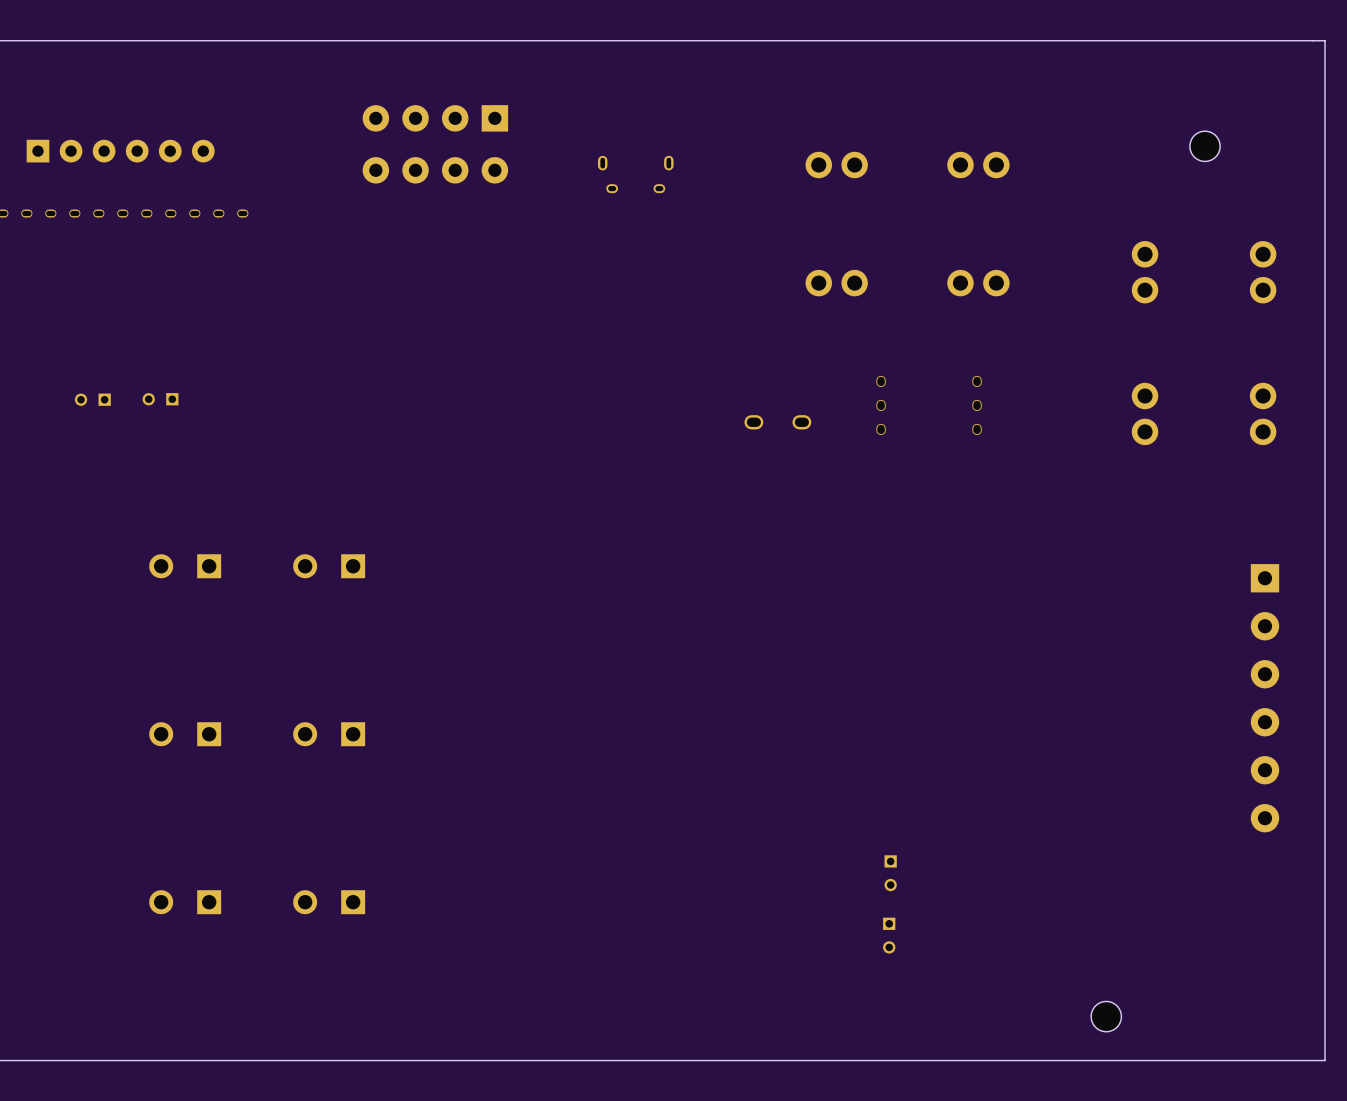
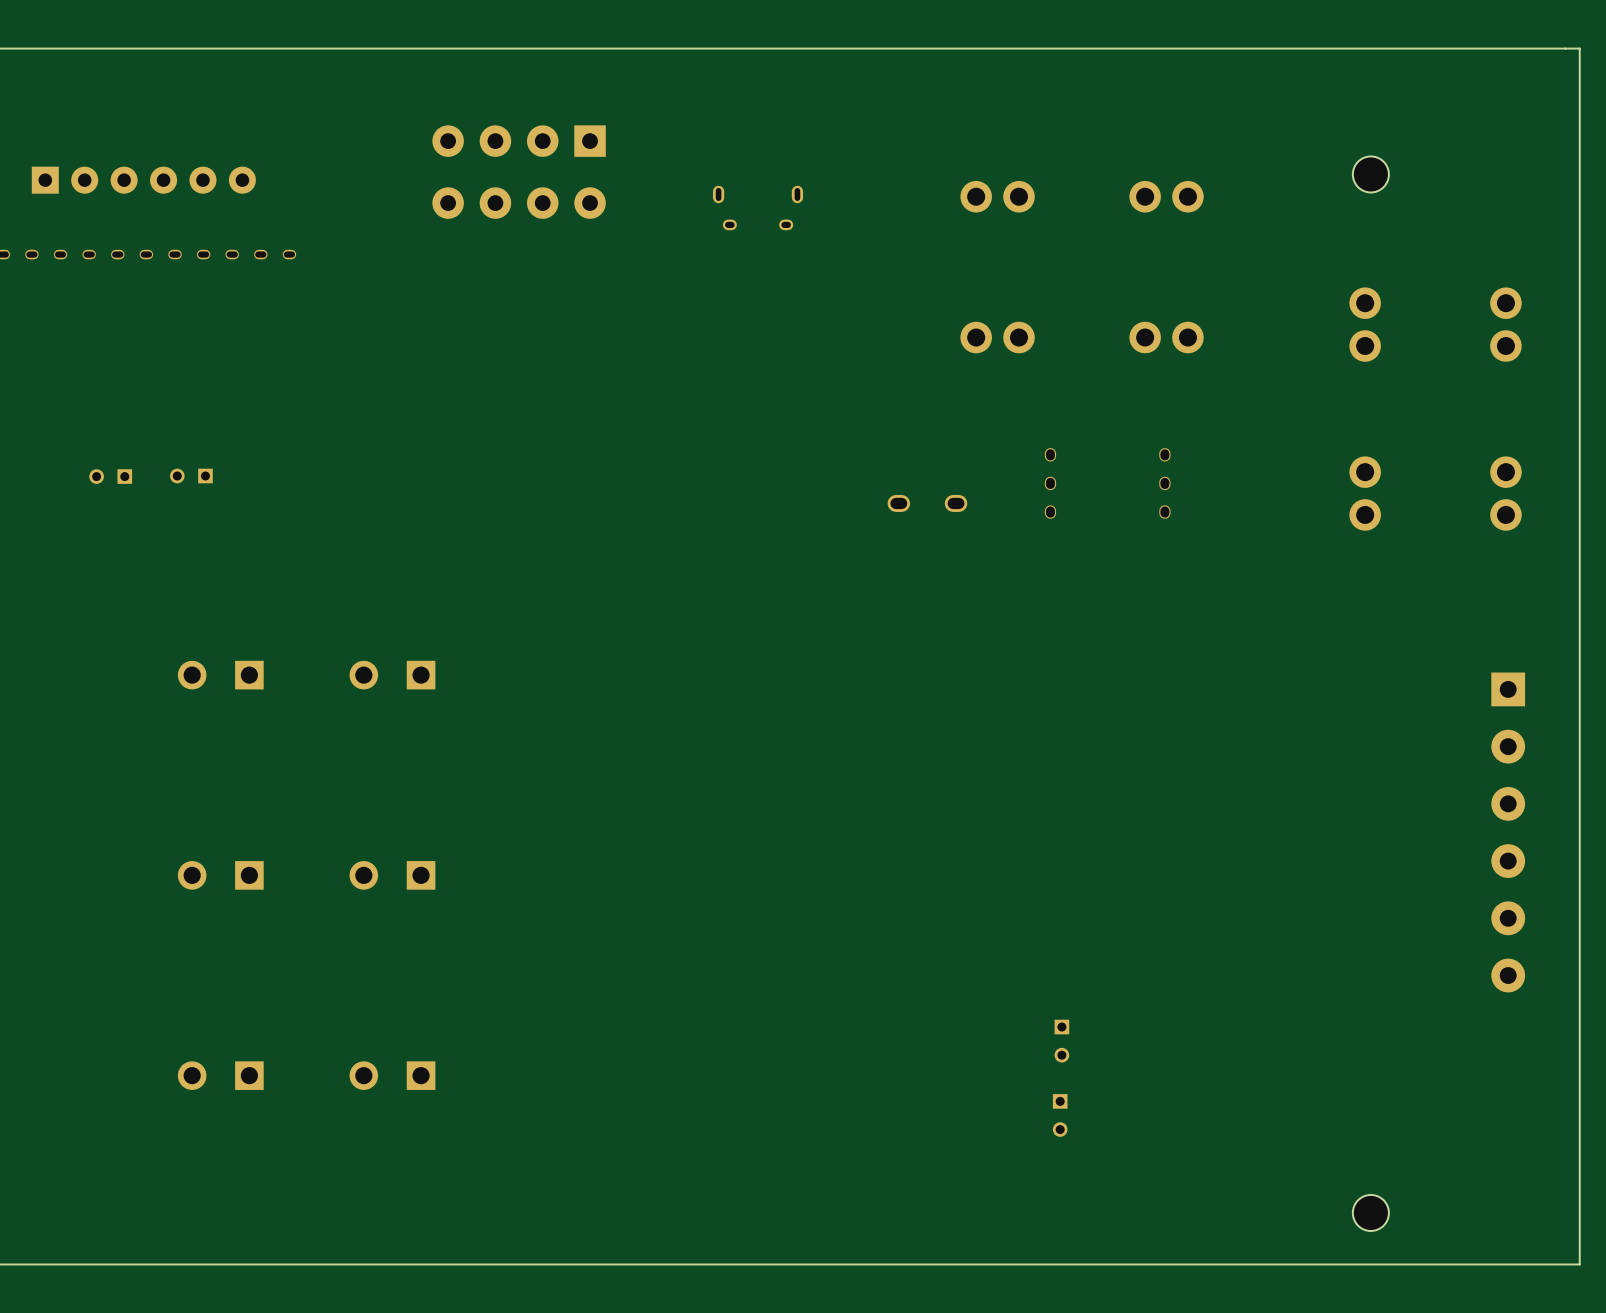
part position: (1205, 146) -> (1370, 174)
part position: (1106, 1016) -> (1370, 1212)

